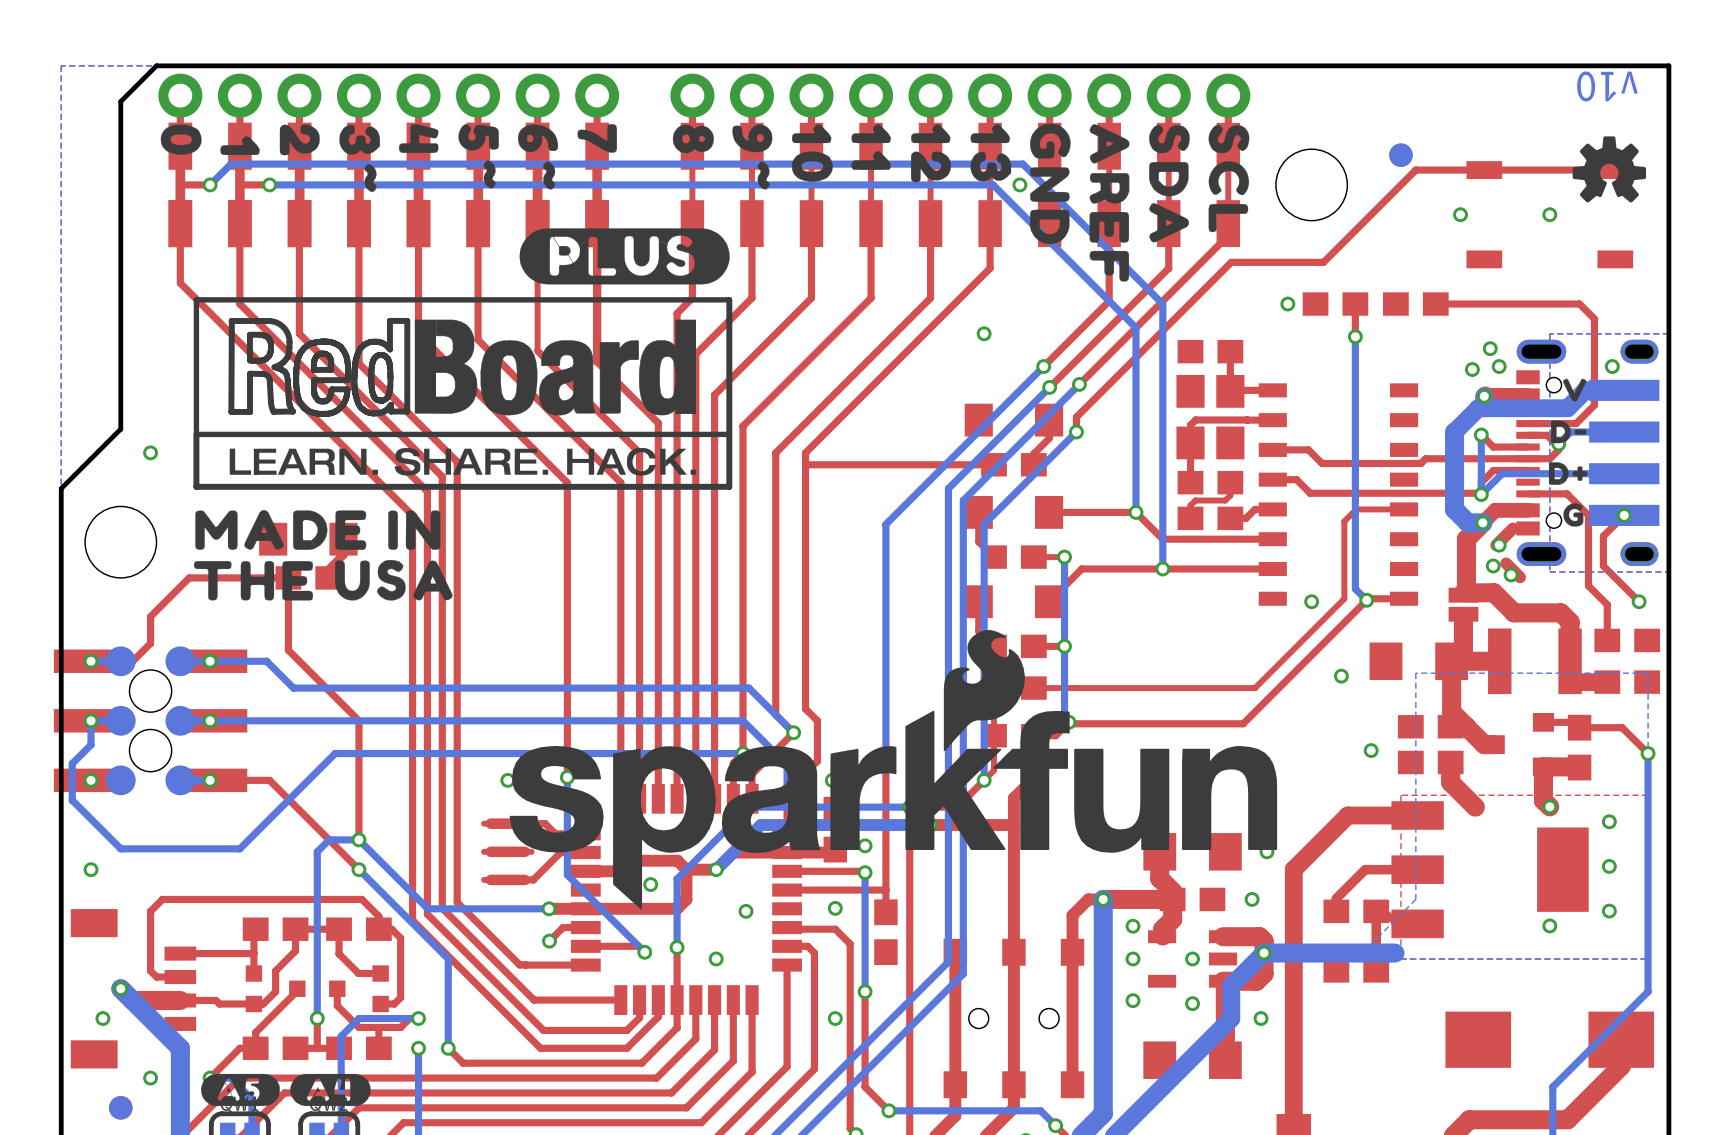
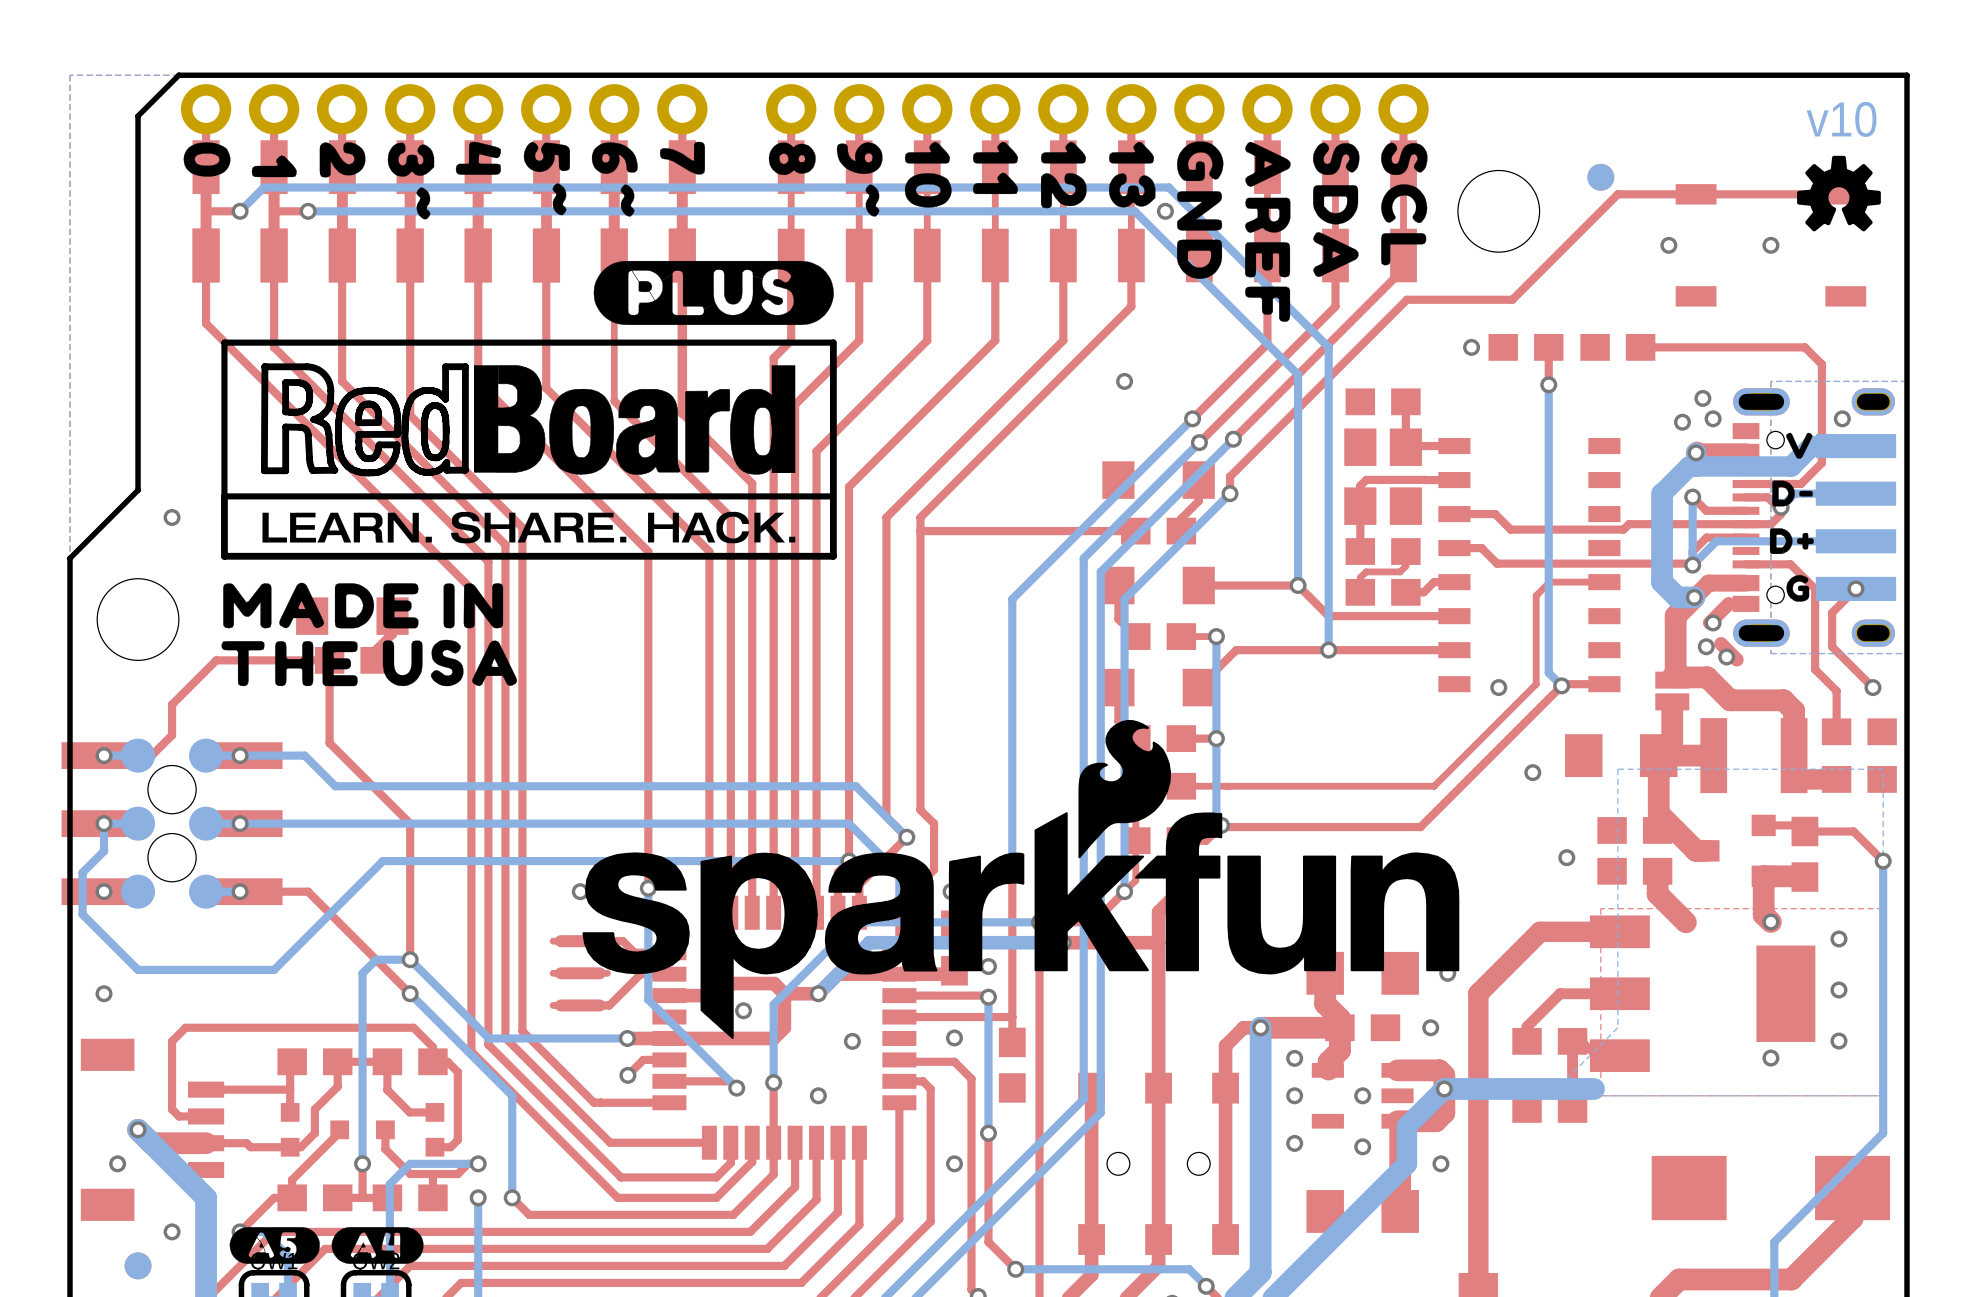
text rotation: 0° (1607, 86) -> 180° (1841, 119)

